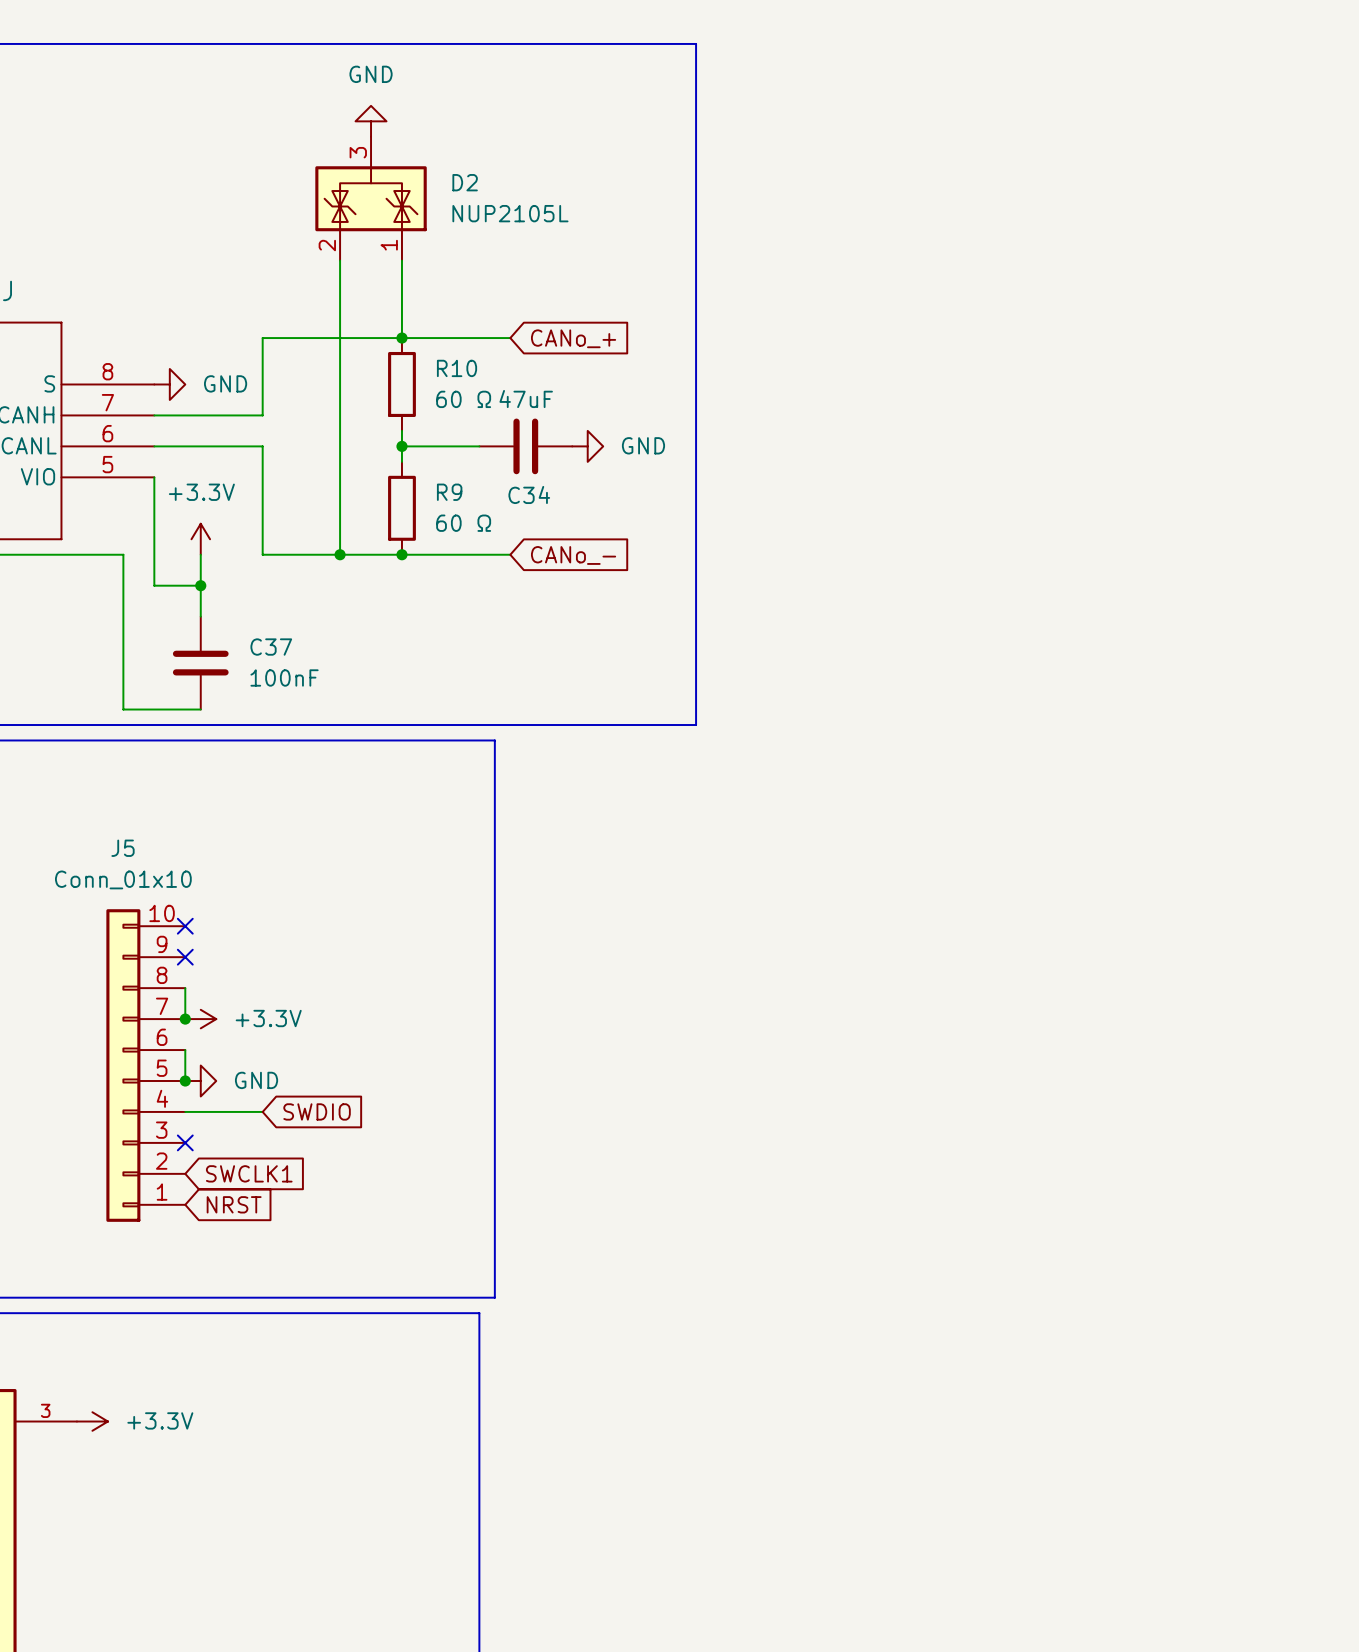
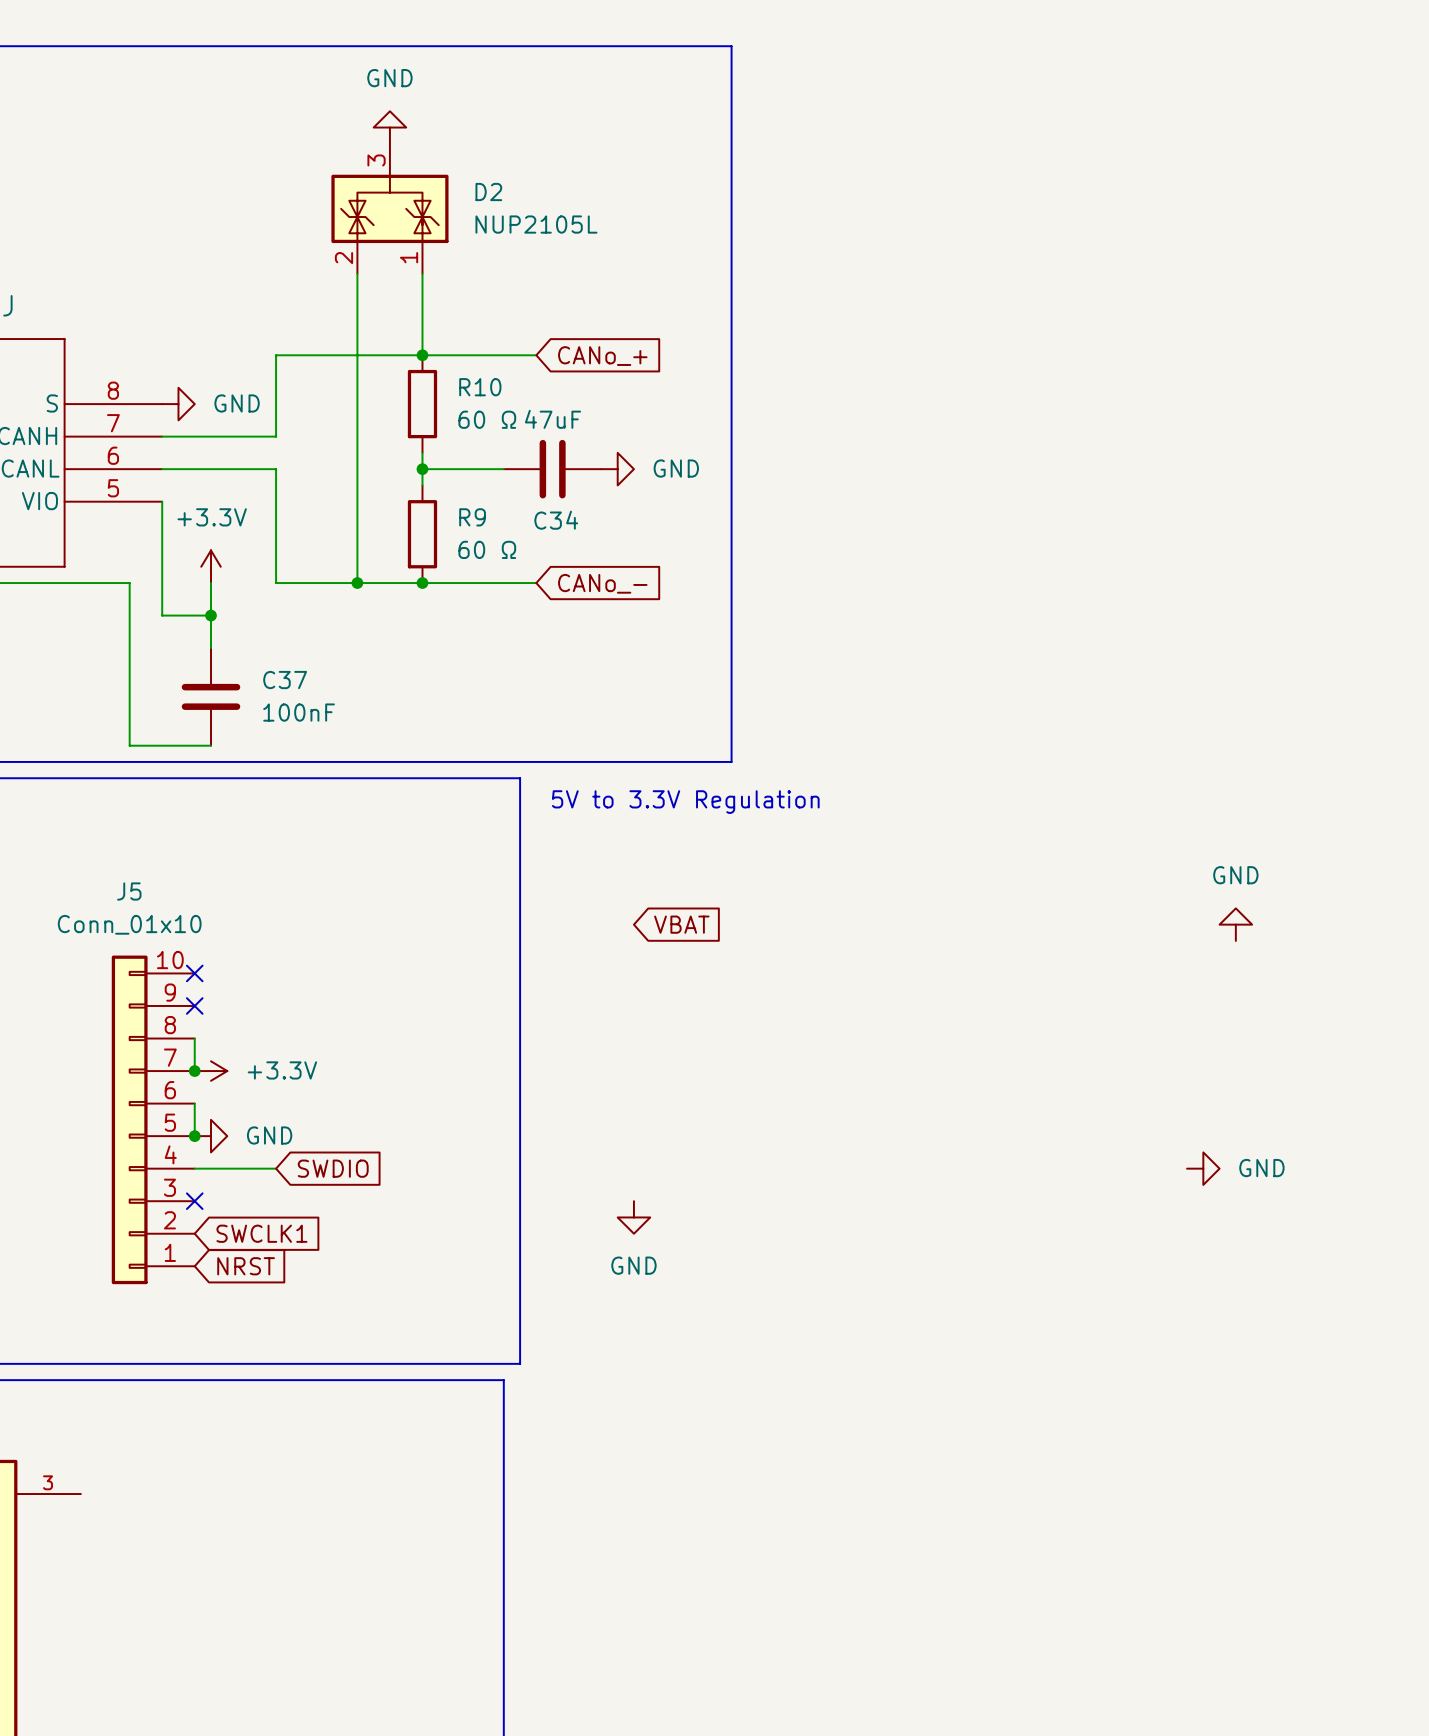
text: none -> 5V to 3.3V Regulation (685, 802)
global label: none -> VBAT (681, 924)
power symbol: none -> GND (1235, 924)
power symbol: none -> GND (1203, 1168)
power symbol: none -> GND (633, 1217)
power symbol: +3.3V (92, 1421) -> none

